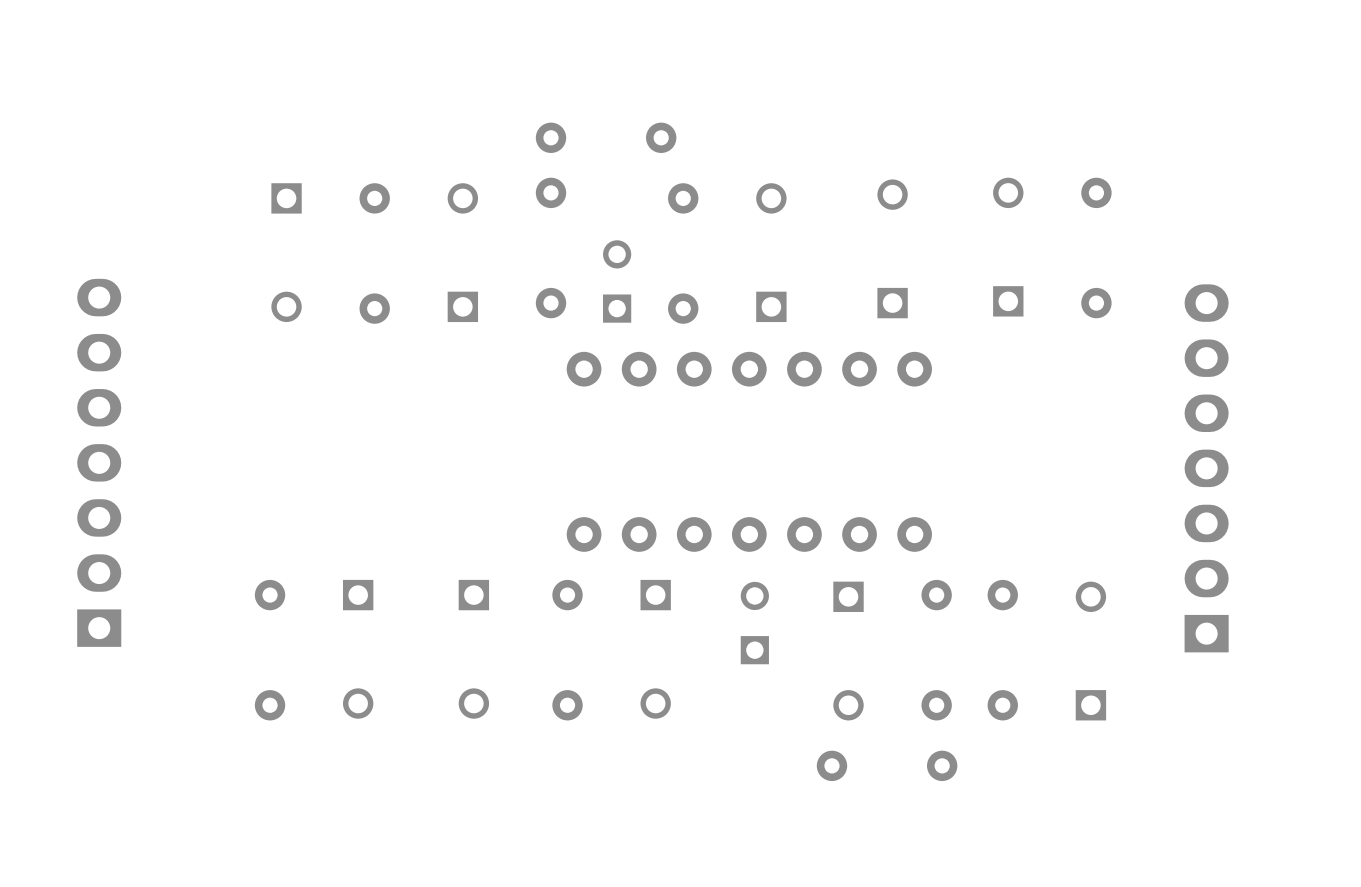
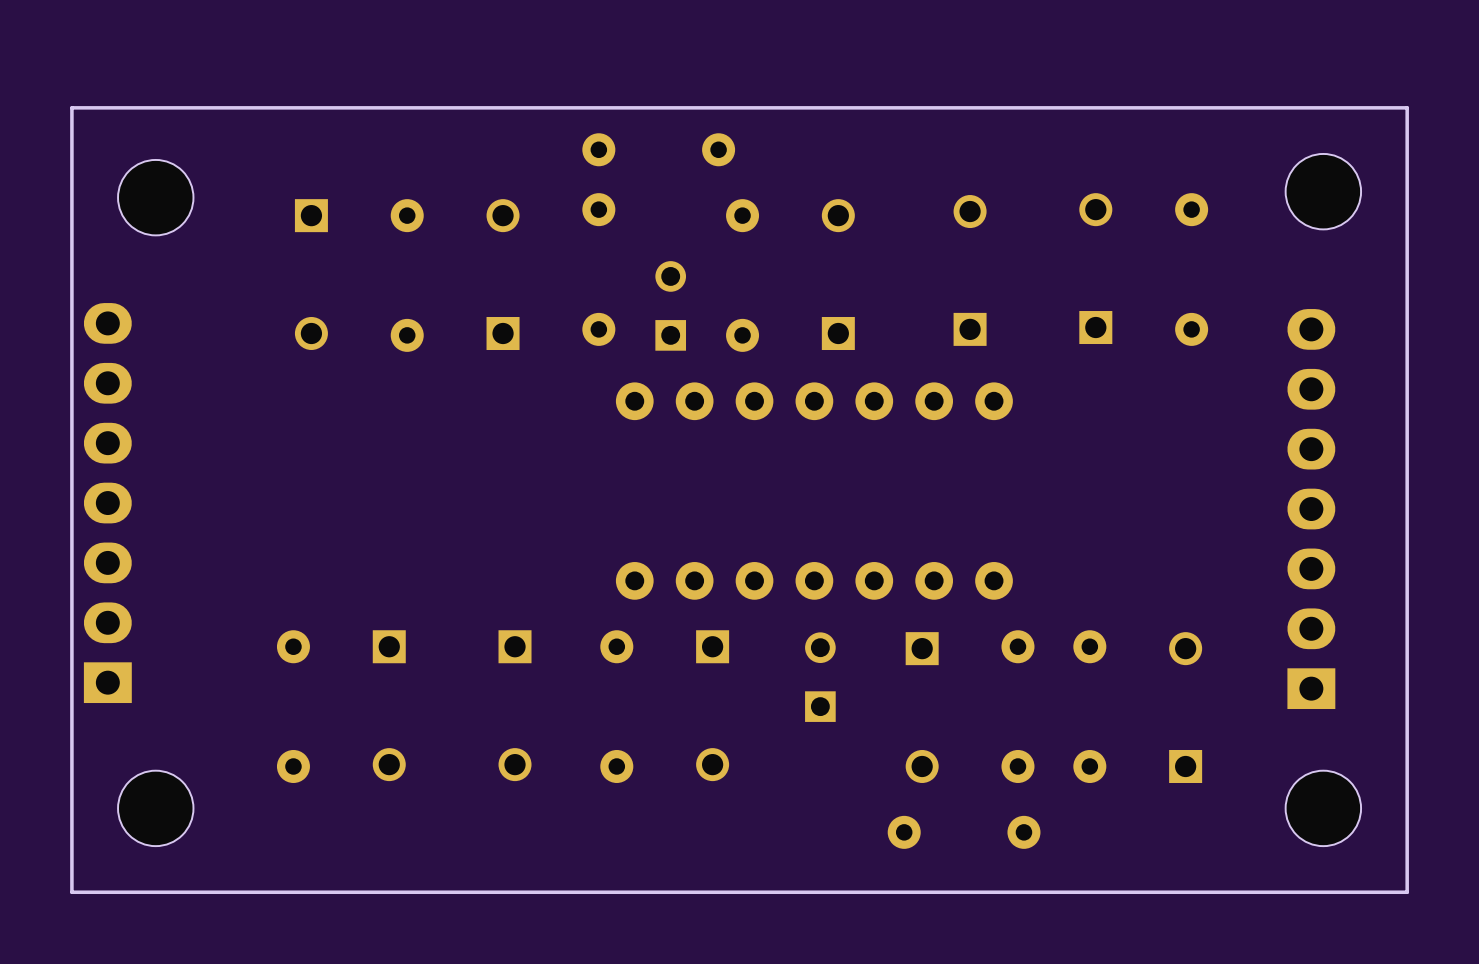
board edge: none -> (1407, 107) (1407, 892) (71, 892) (71, 107) (1407, 107)
part: none -> (1323, 191)
part: none -> (155, 197)
part: none -> (155, 808)
part: none -> (1323, 808)

